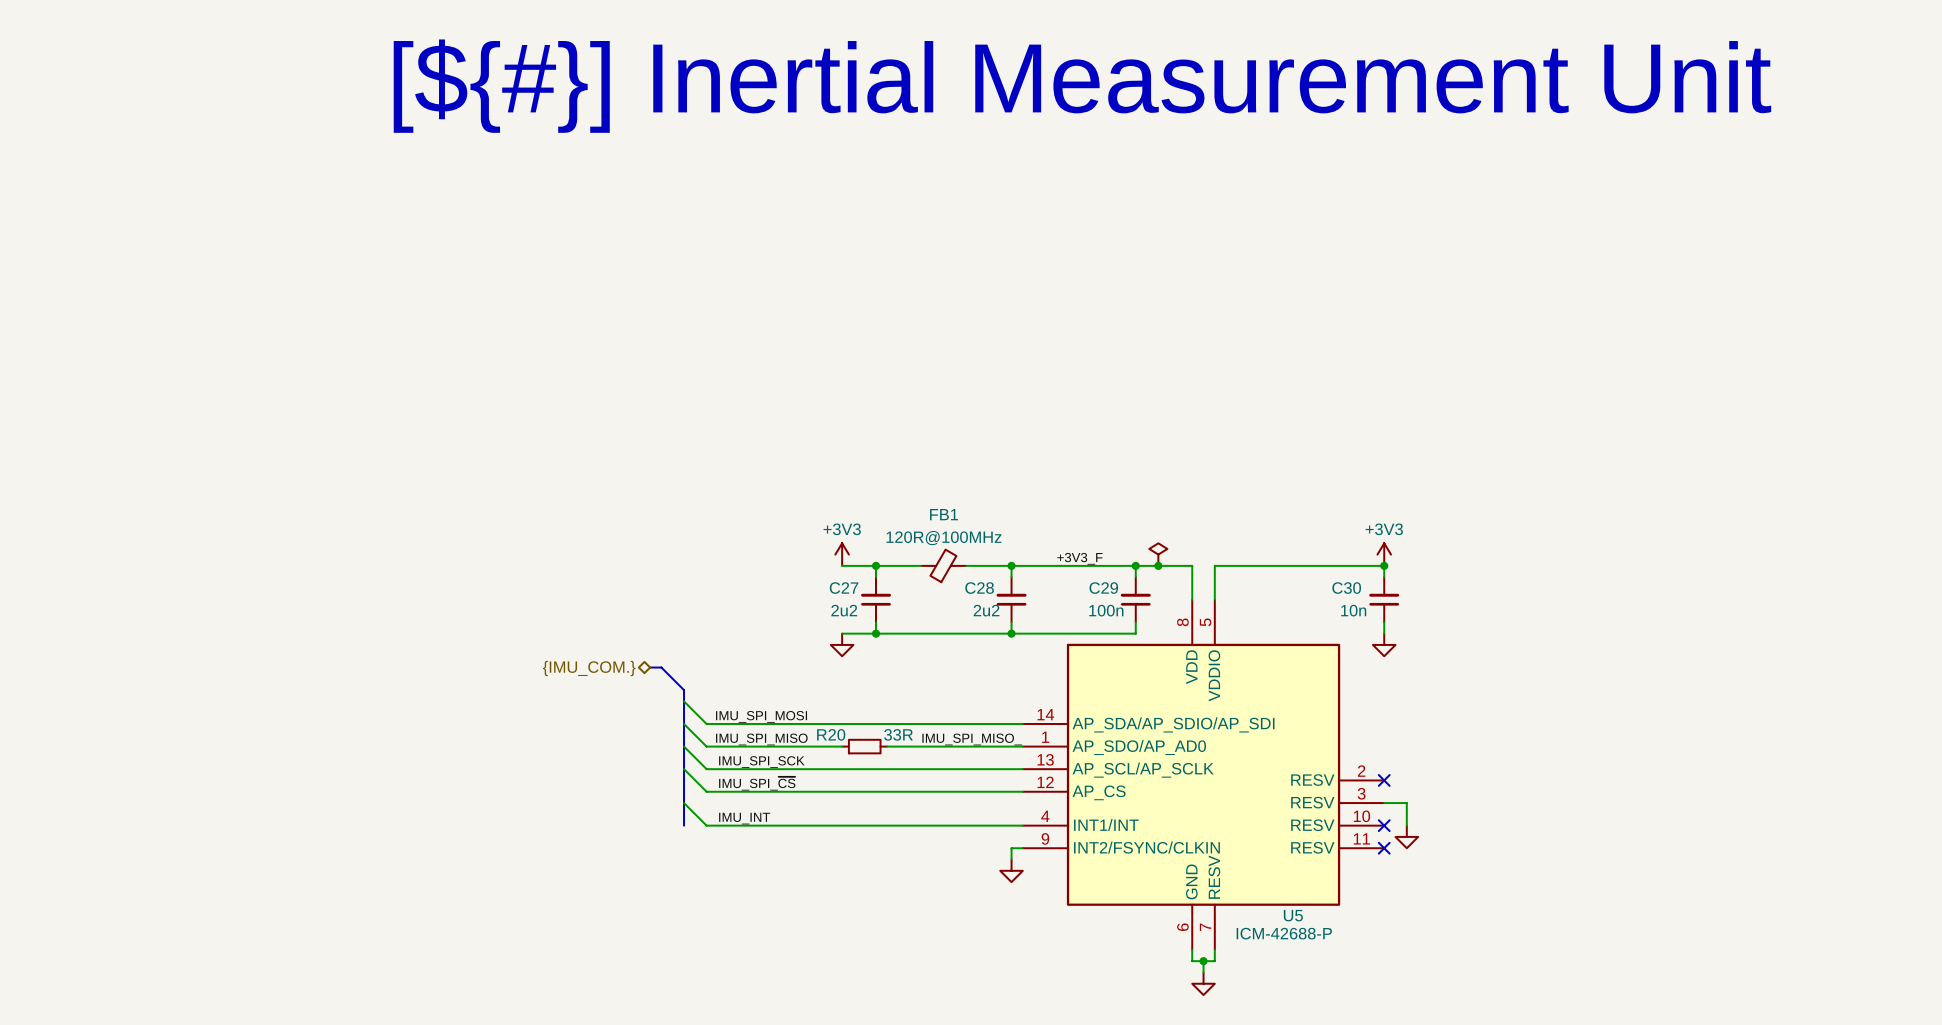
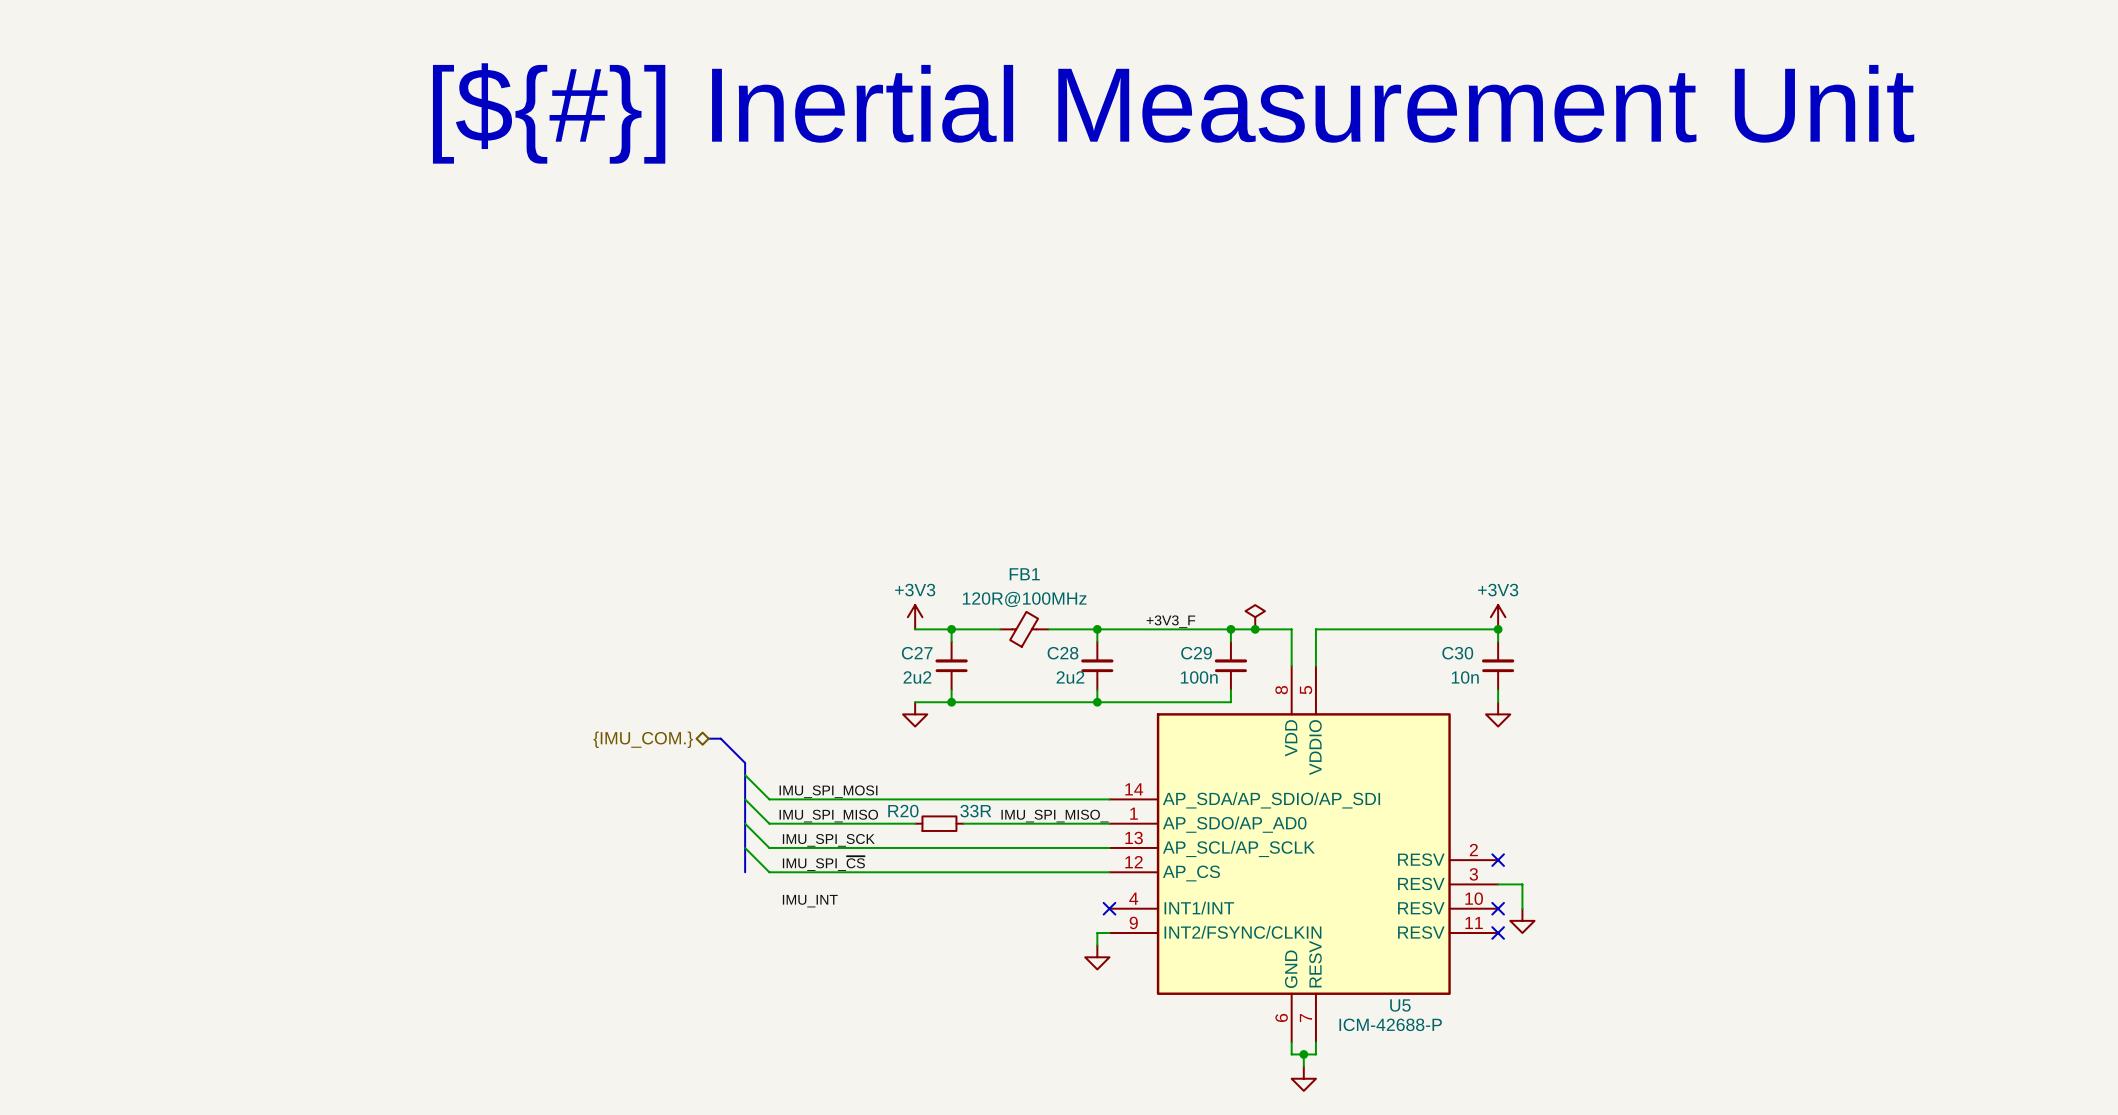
bus: (684, 791) (684, 825) -> none
wire: (684, 803) (706, 825) (1022, 825) -> none
no-connect mark: none -> (1109, 908)

